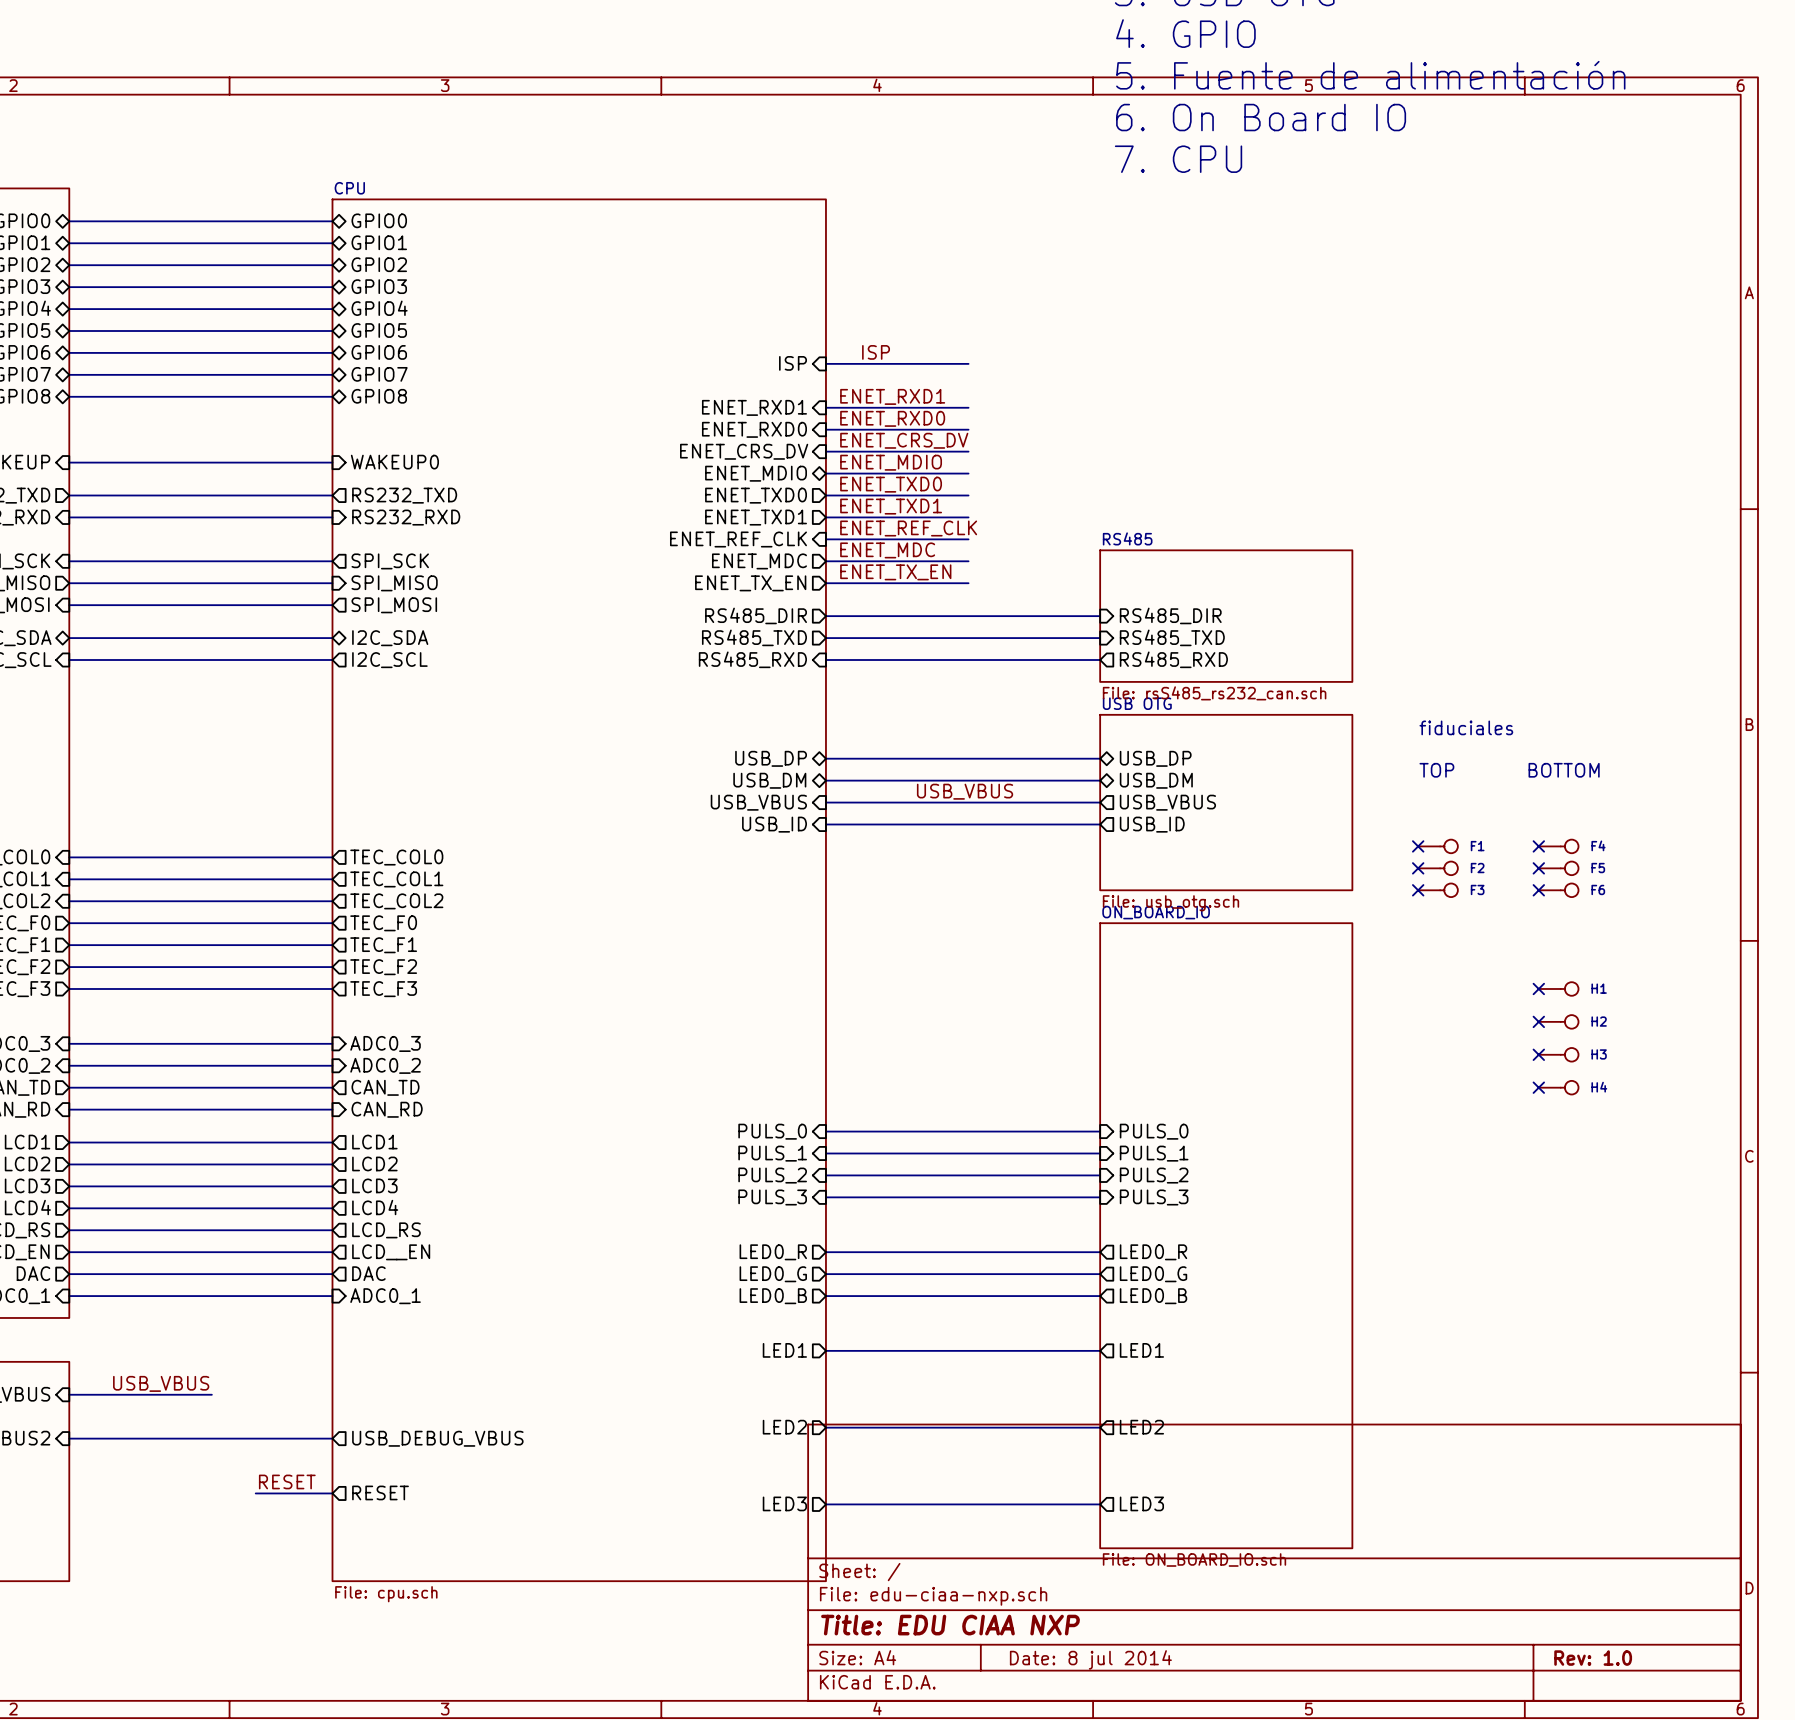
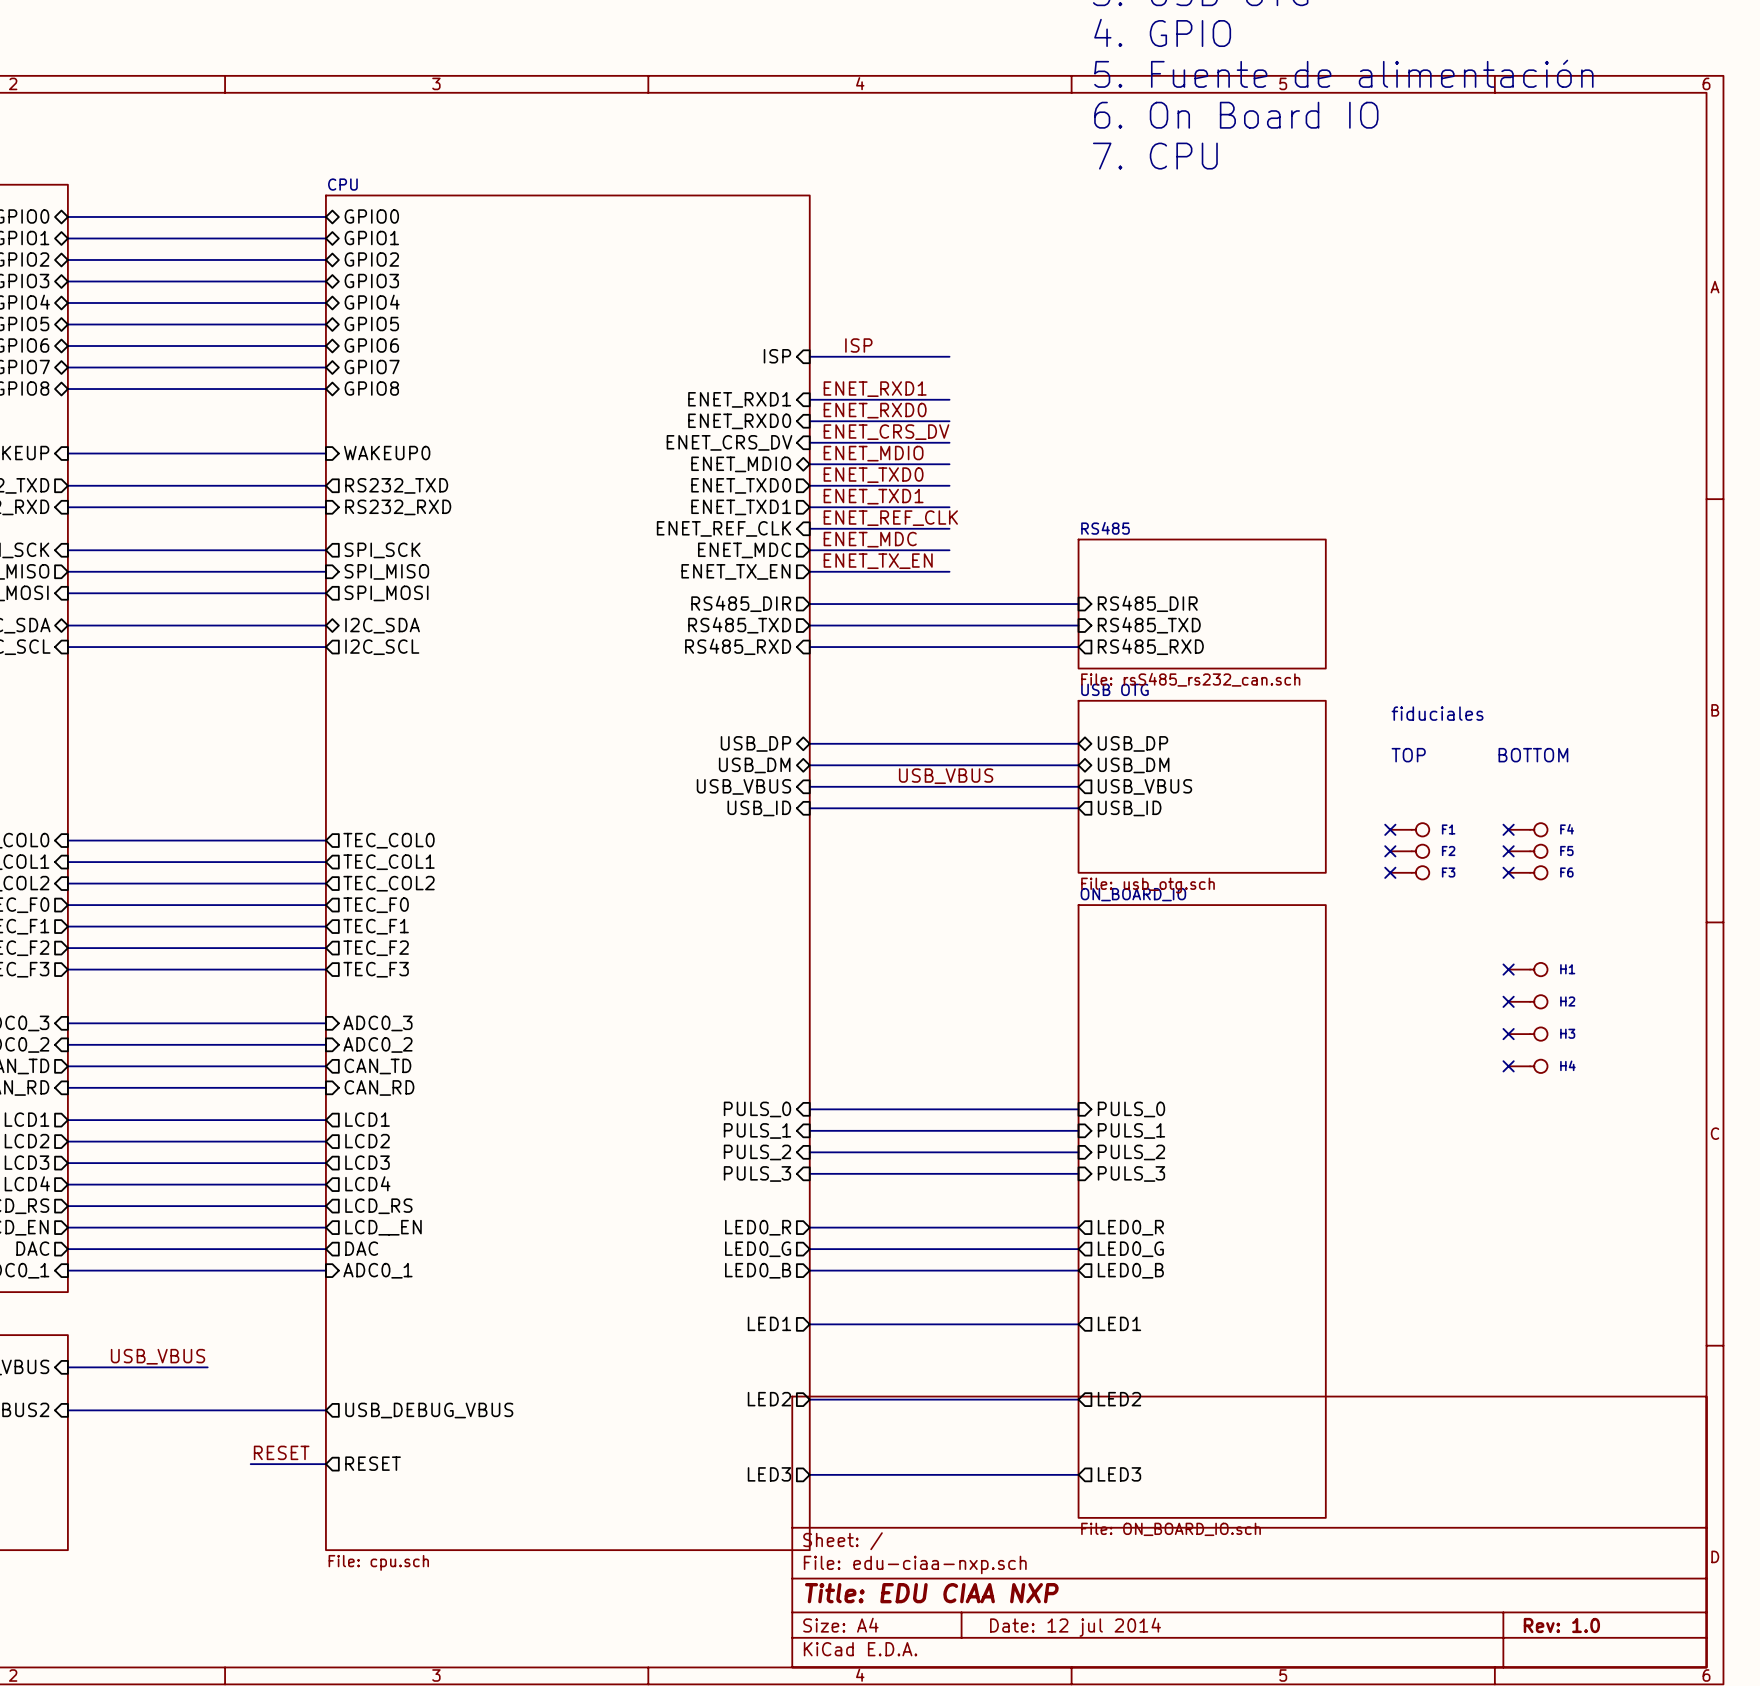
title block: Date: 8 jul 2014 (1090, 1659) -> Date: 12 jul 2014 (1075, 1627)

